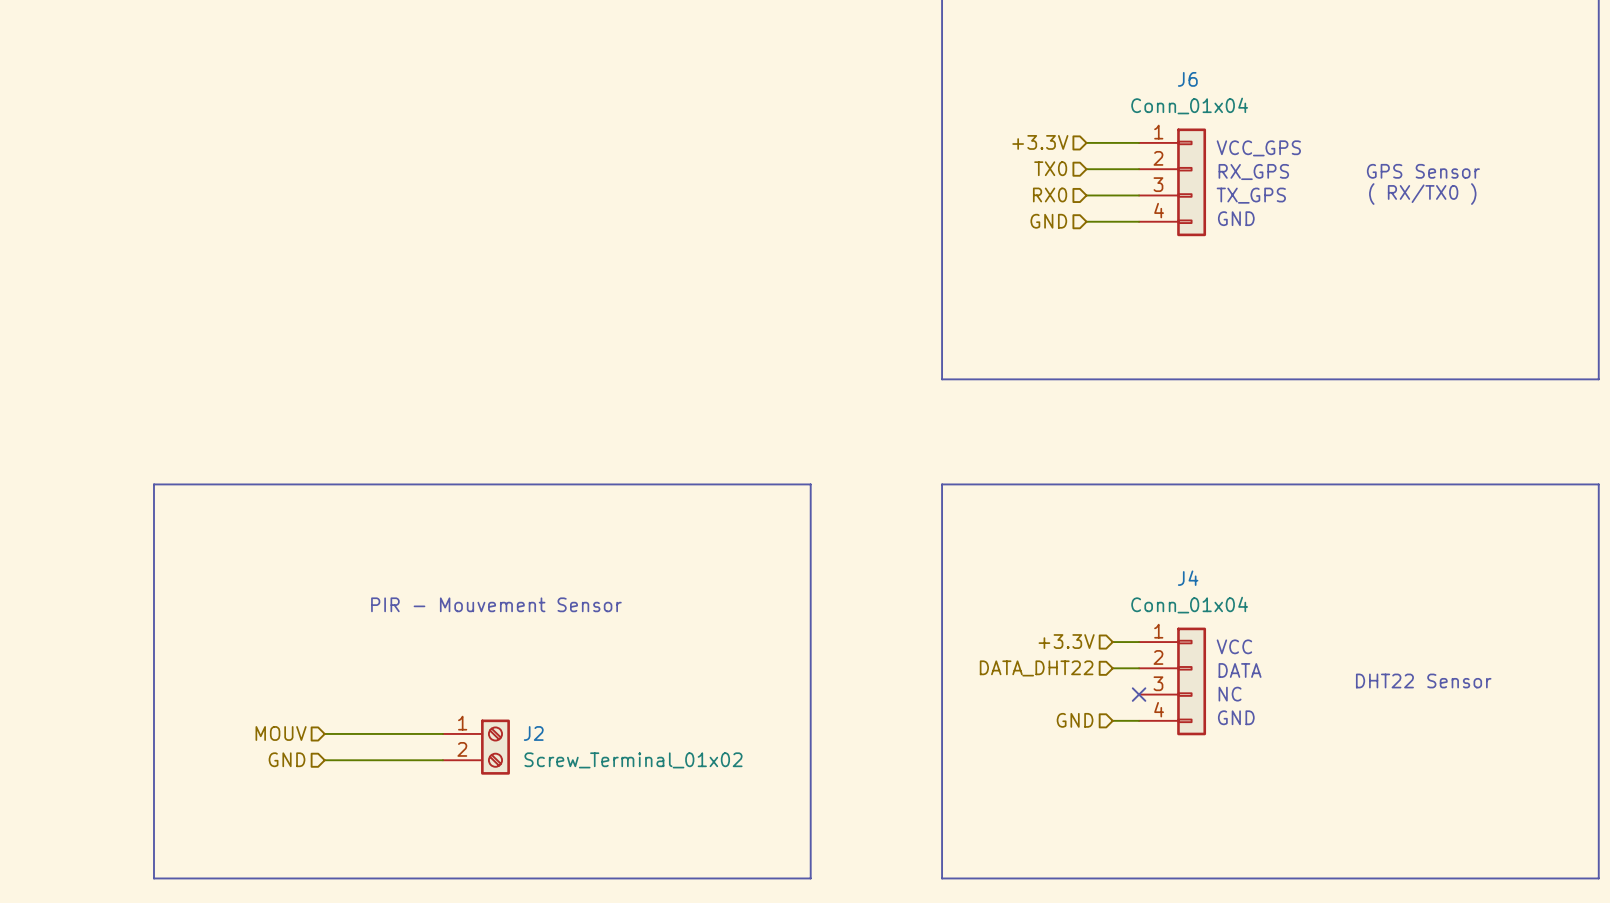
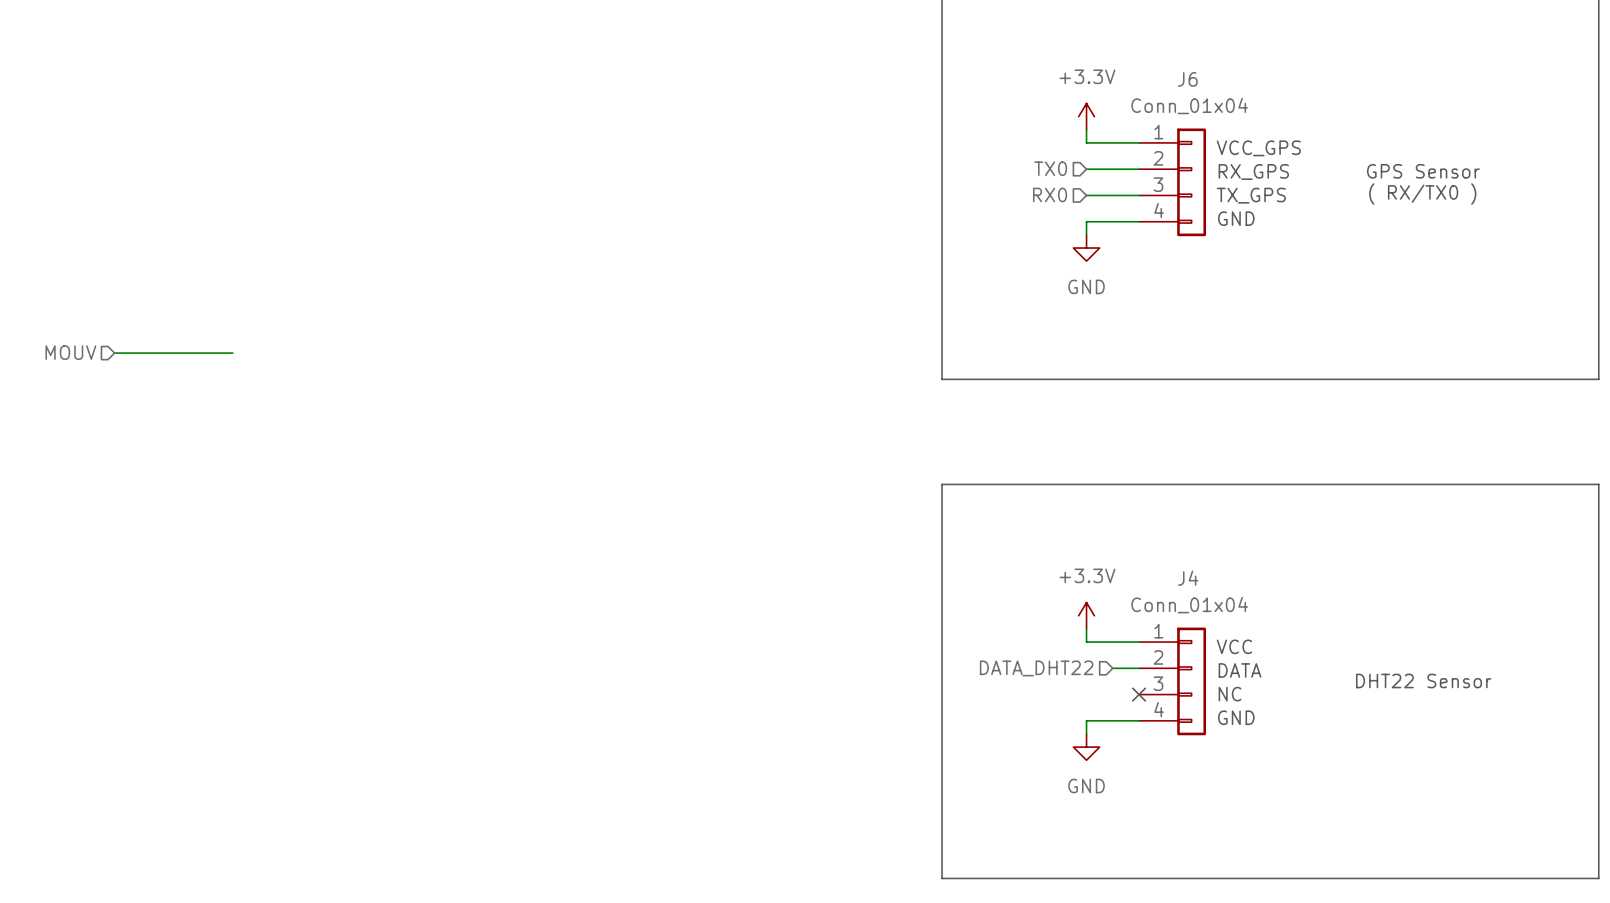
power symbol: none -> +3.3V (1086, 116)
wire: none -> (1086, 129) (1086, 142)
hierarchical label: +3.3V (1040, 142) -> none
hierarchical label: GND (1048, 221) -> none
wire: none -> (1086, 221) (1086, 234)
power symbol: none -> GND (1086, 248)
hierarchical label: none -> MOUV (70, 352)
wire: none -> (114, 353) (232, 353)
line: (153, 484) (810, 484) (810, 878) (153, 878) (153, 484) -> none
text: PIR - Mouvement Sensor (496, 604) -> none
power symbol: none -> +3.3V (1086, 615)
wire: none -> (1086, 628) (1086, 642) (1112, 642)
hierarchical label: +3.3V (1066, 641) -> none
hierarchical label: GND (1075, 720) -> none
wire: none -> (1112, 720) (1086, 720) (1086, 733)
hierarchical label: MOUV (281, 733) -> none
wire: (324, 733) (442, 733) -> none
J2: Screw_Terminal_01x02 (476, 747) -> none
power symbol: none -> GND (1086, 747)
hierarchical label: GND (287, 759) -> none
wire: (324, 760) (442, 760) -> none

